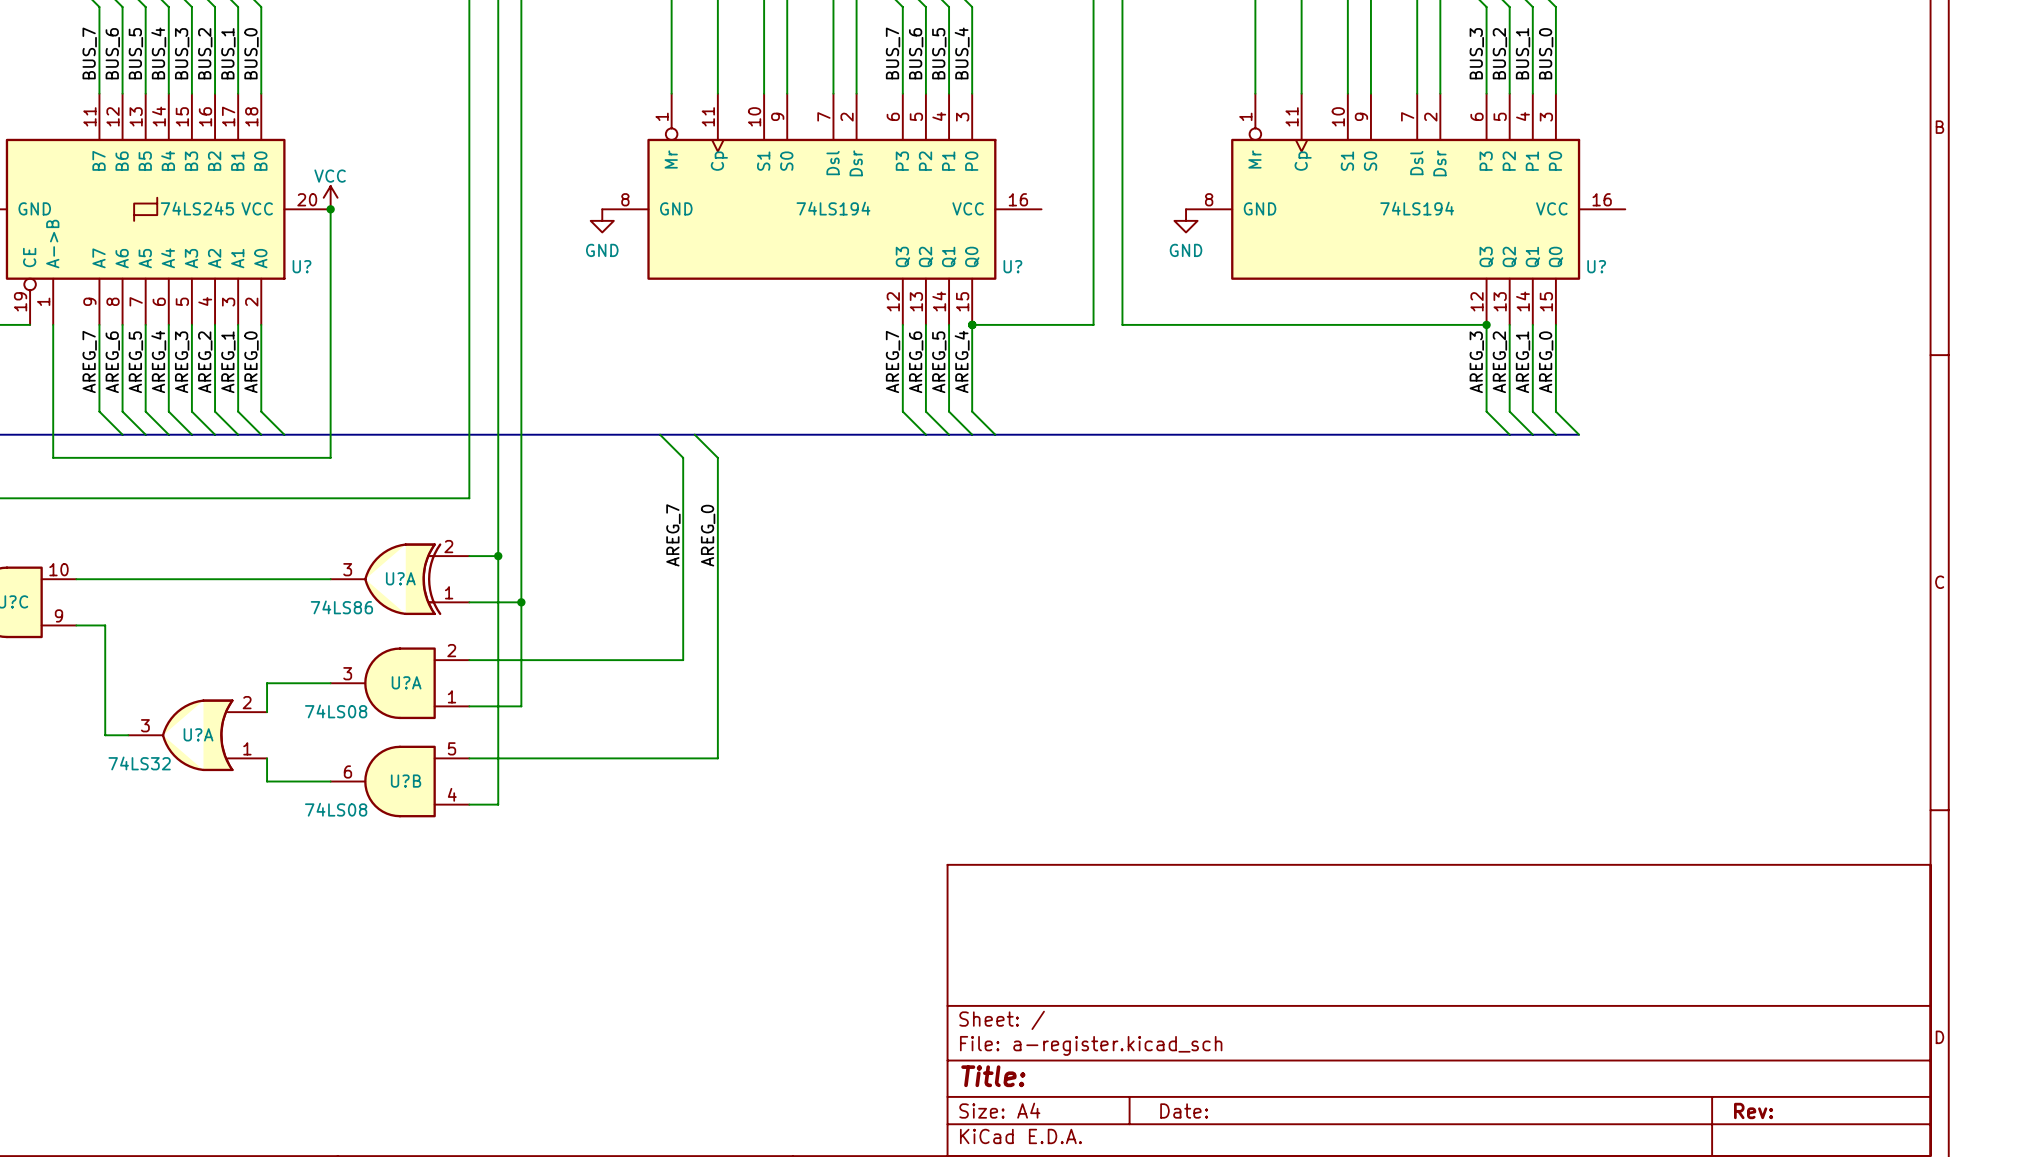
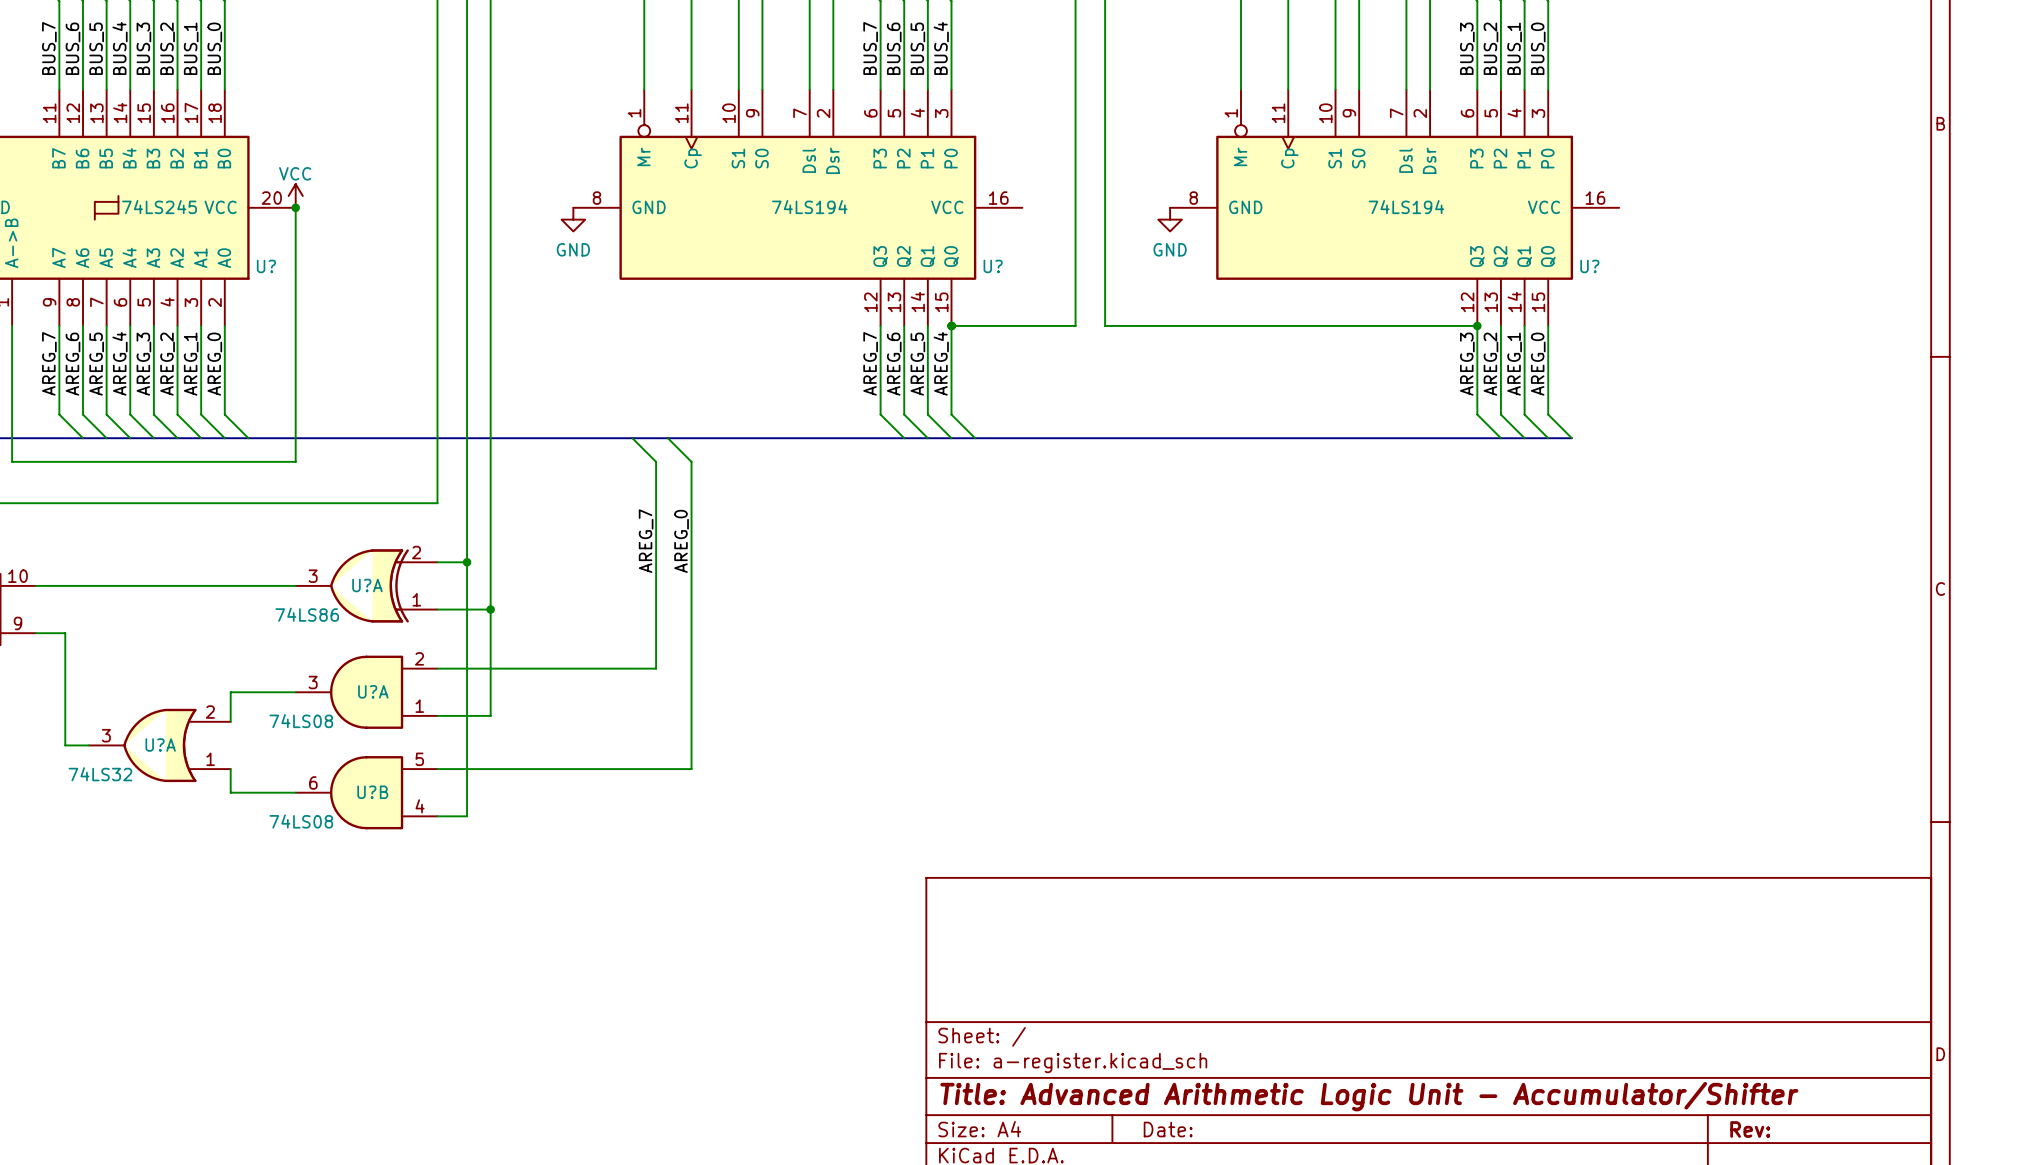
title block: Title: (993, 1076) -> Title: Advanced Arithmetic Logic Unit - Accumulator/Shifter (1369, 1096)

